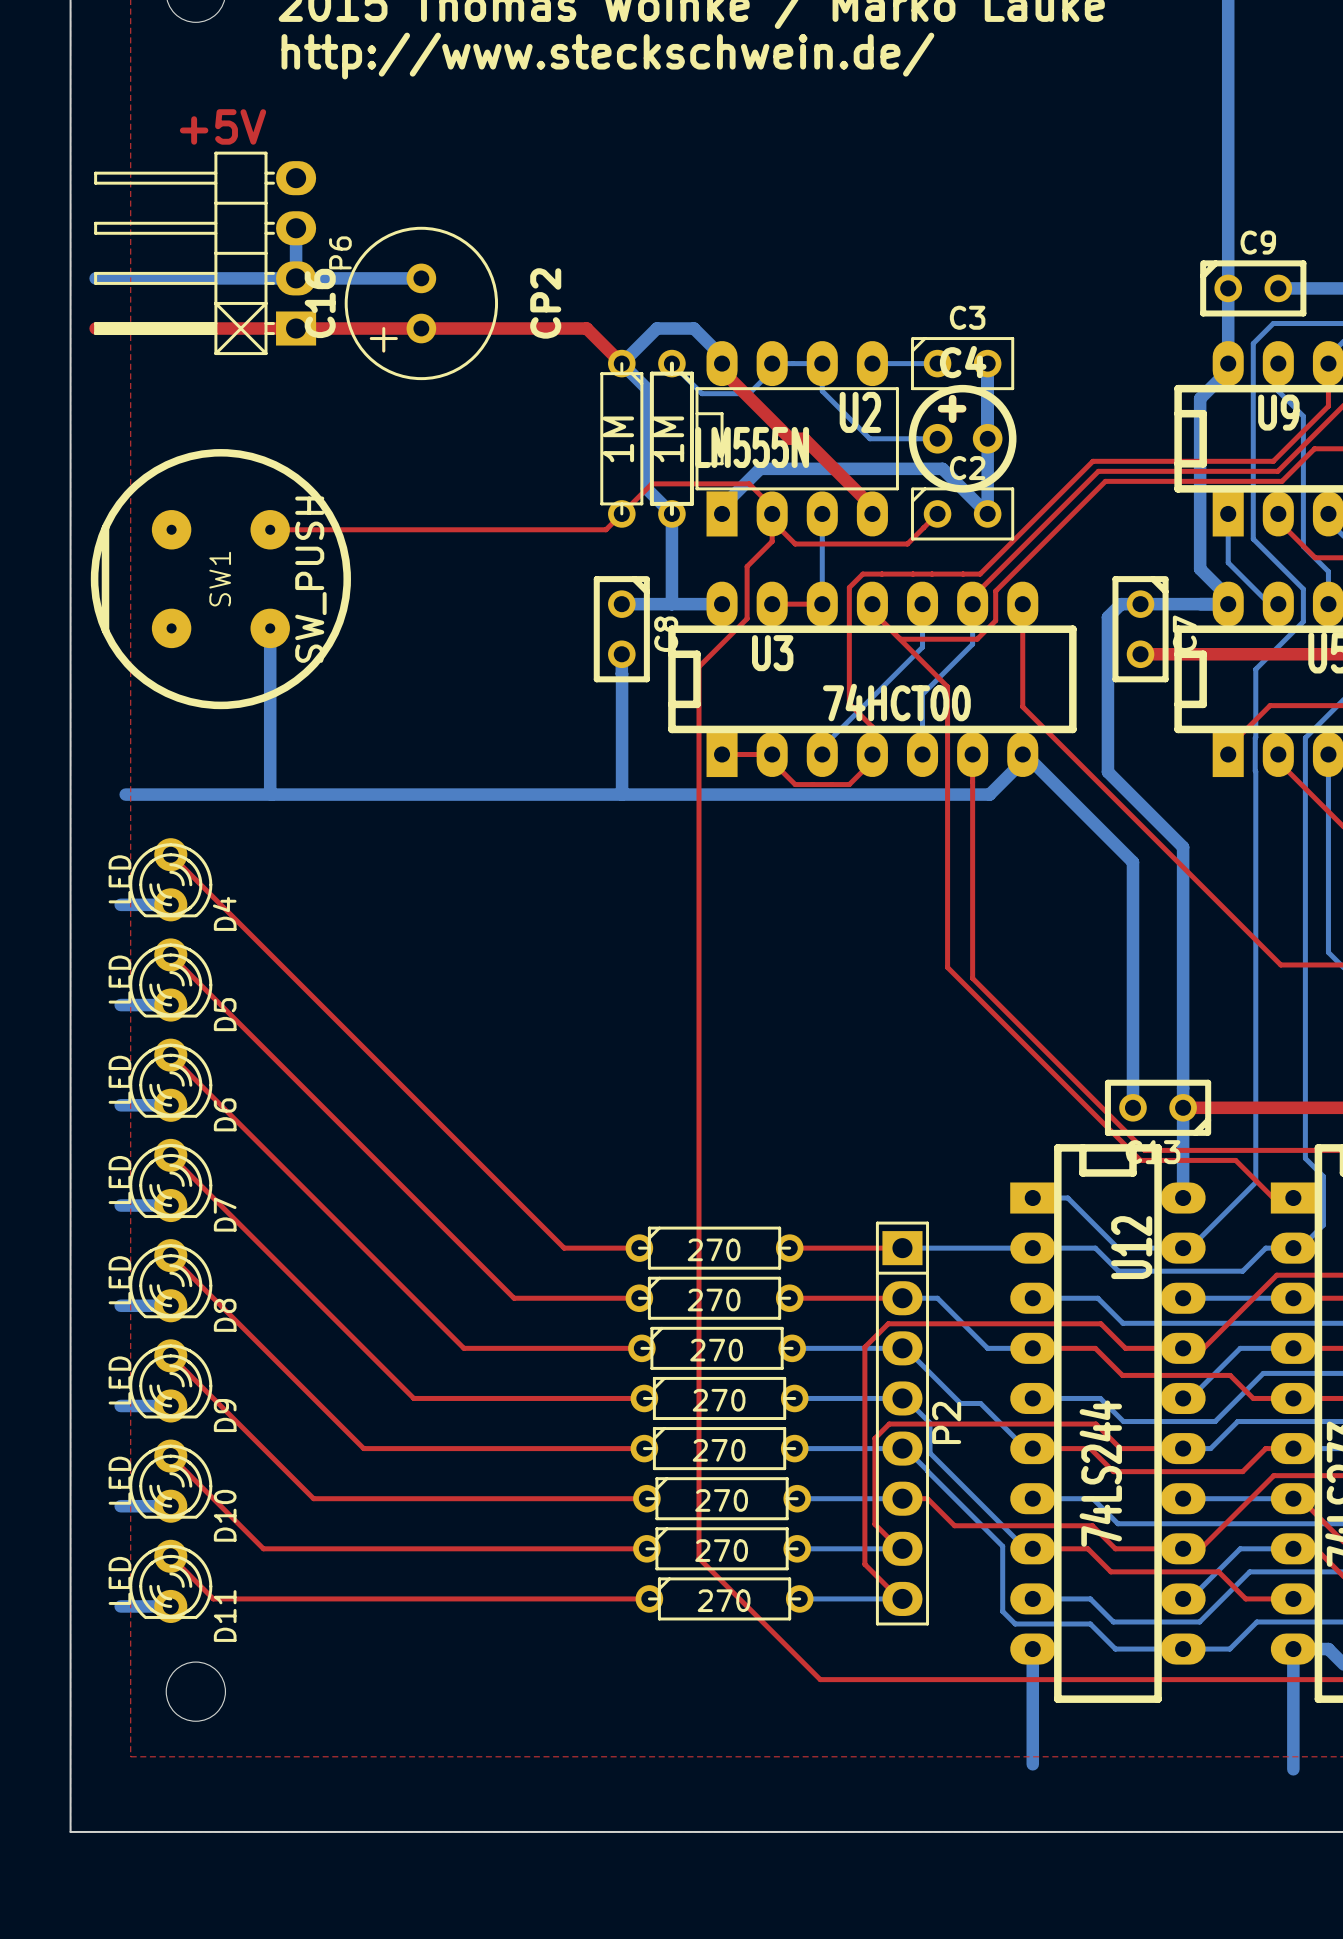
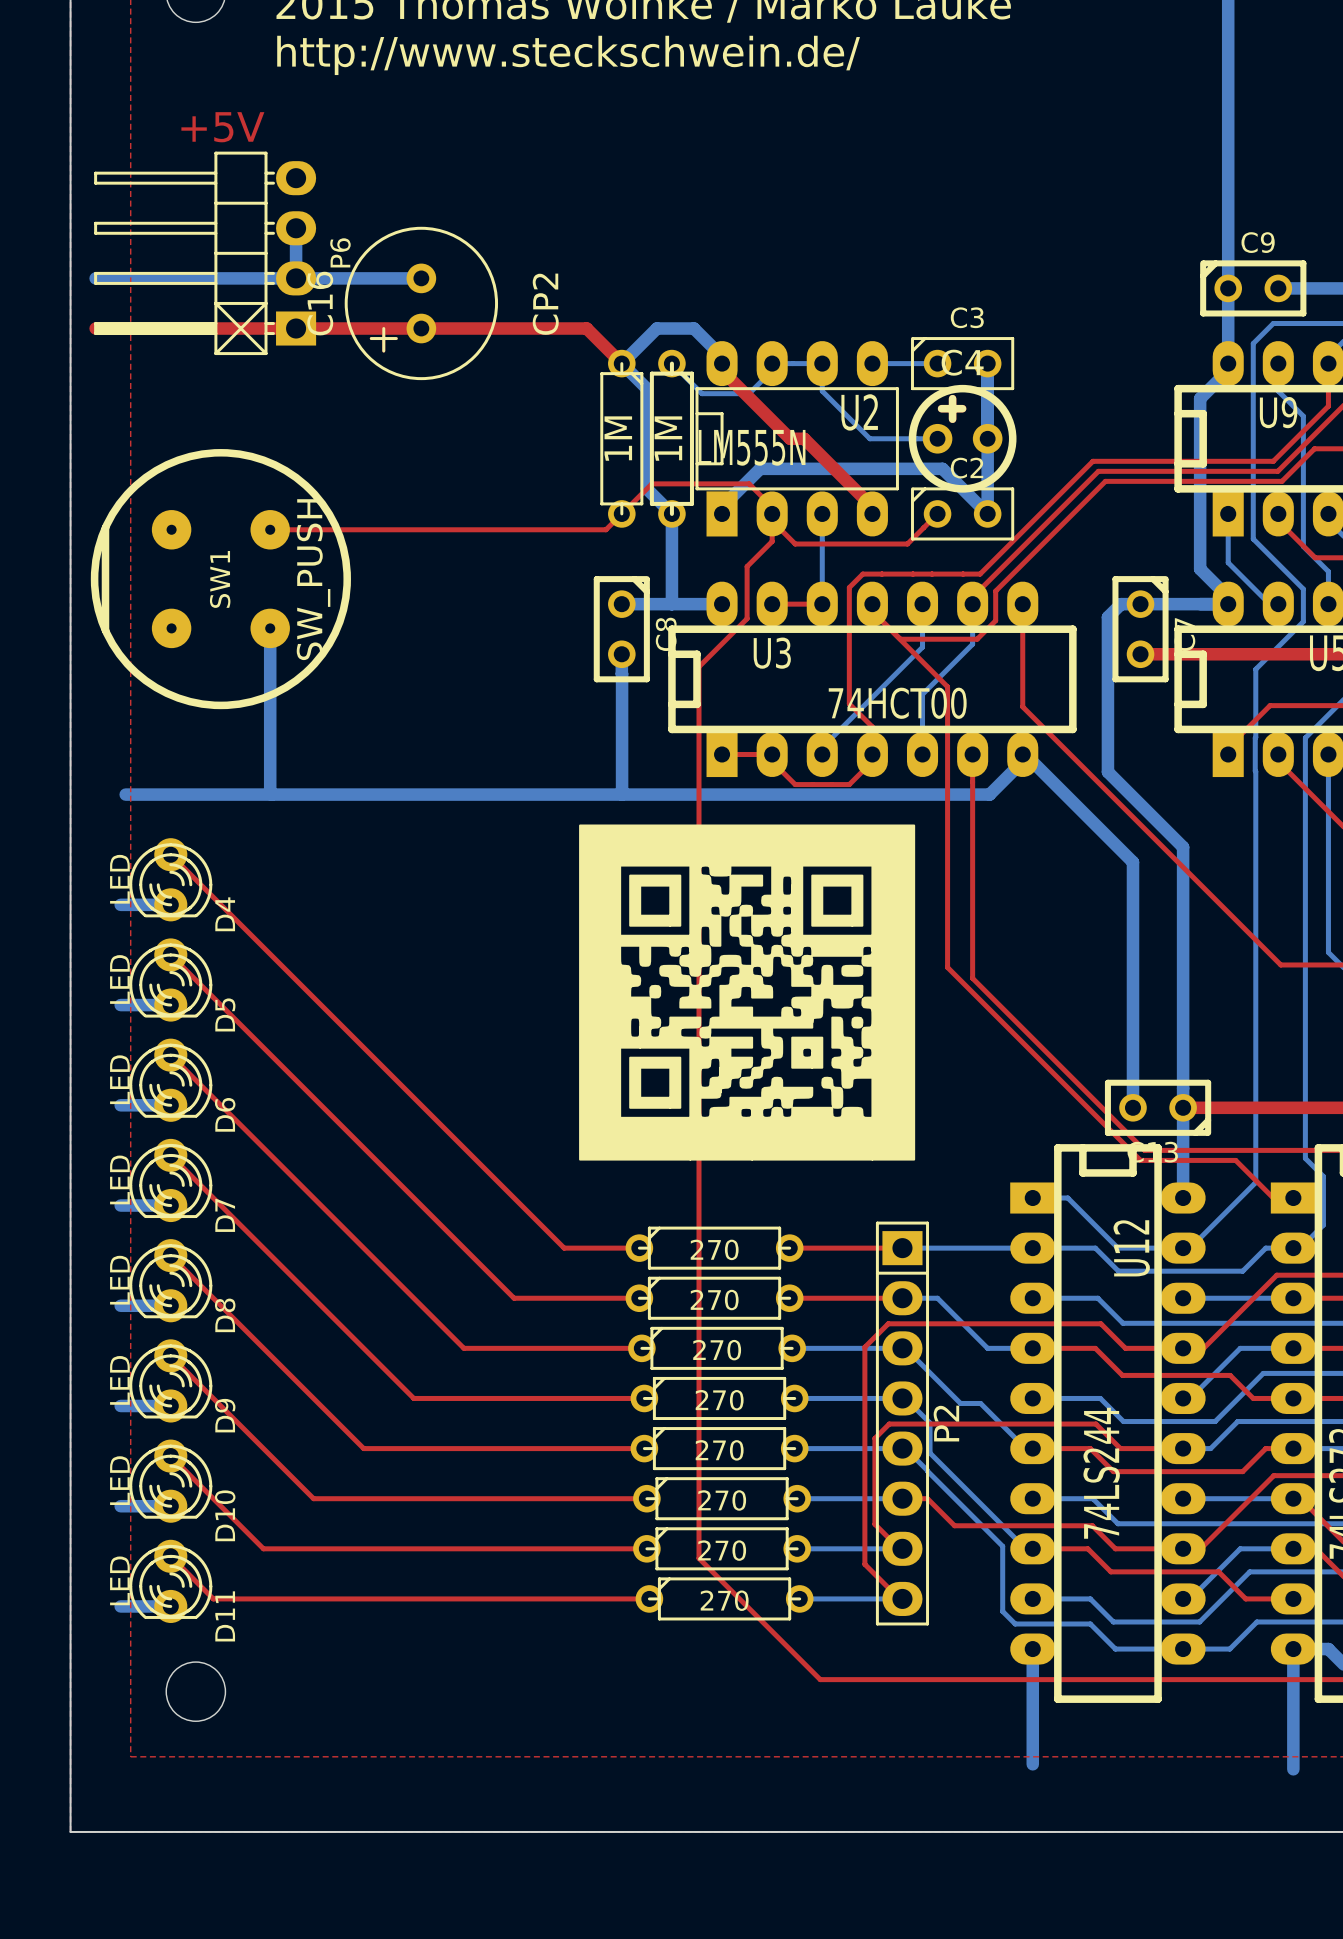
drawing: none -> [579, 824, 916, 1161]

